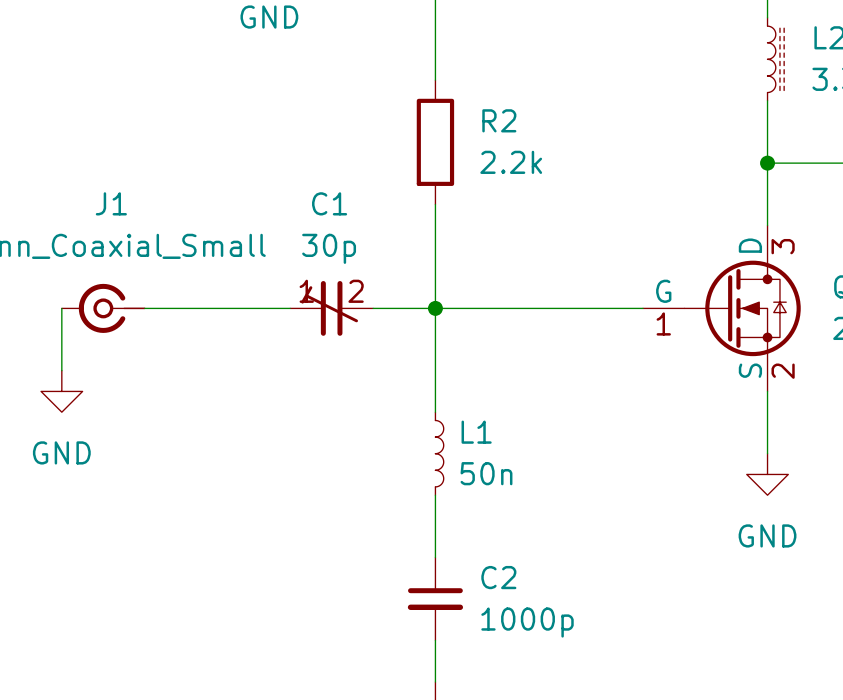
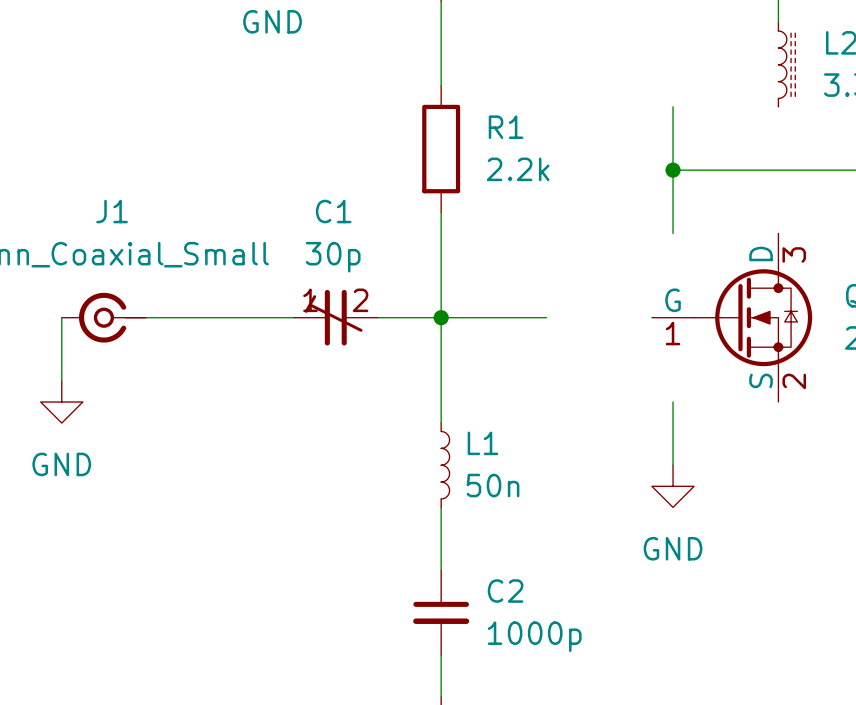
wire: (767, 100) (767, 225) -> (673, 106) (673, 233)
R2 name: R2 (499, 120) -> R1 (506, 127)
junction: none -> (673, 170)
junction: (767, 163) -> none
wire: (539, 308) (642, 308) -> (673, 170) (778, 170)
wire: (767, 391) (767, 453) -> (673, 402) (673, 465)
power symbol position: GND (767, 474) -> GND (673, 486)

